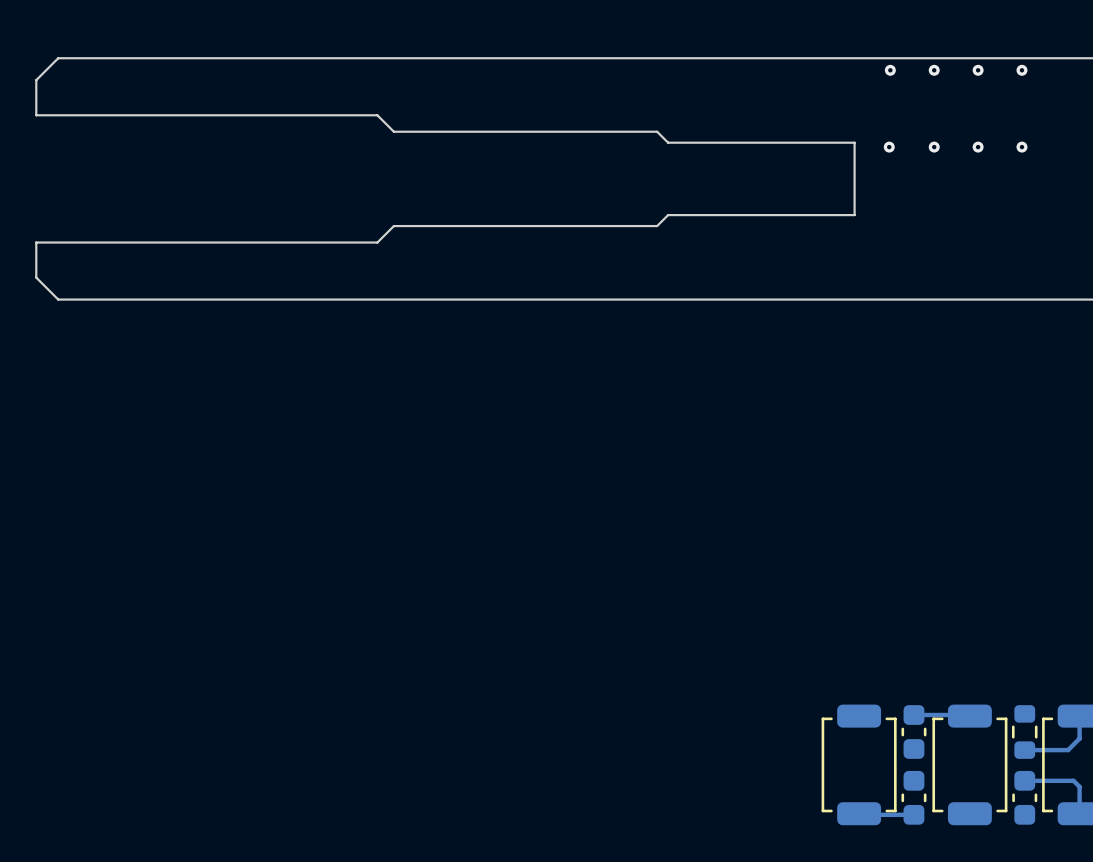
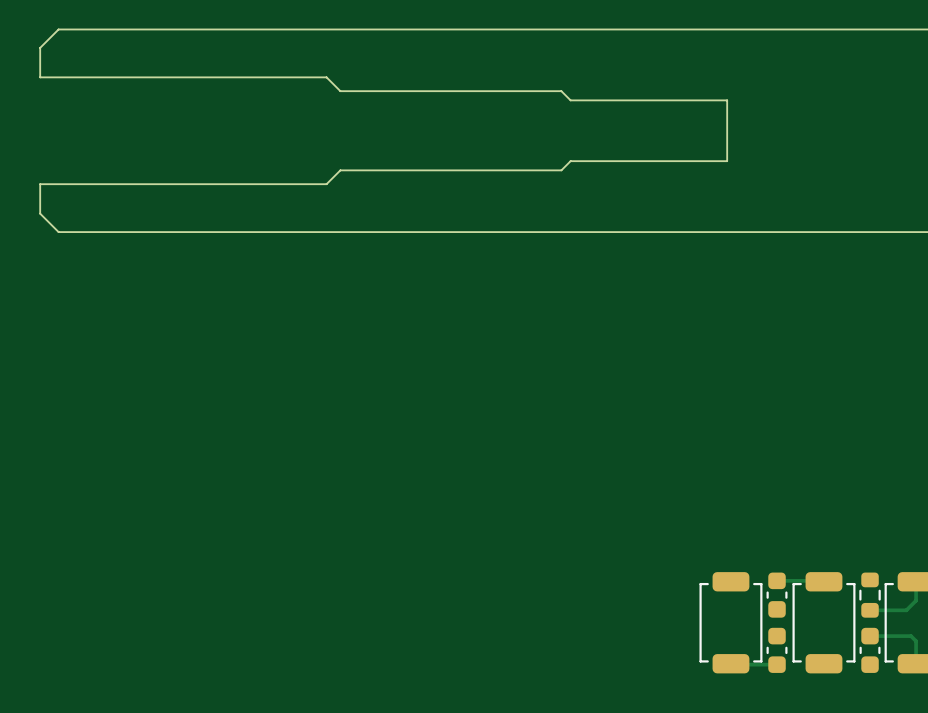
via: (890, 70) -> none
via: (934, 70) -> none
via: (978, 70) -> none
via: (1021, 70) -> none
via: (889, 147) -> none
via: (934, 147) -> none
via: (978, 147) -> none
via: (1021, 147) -> none

